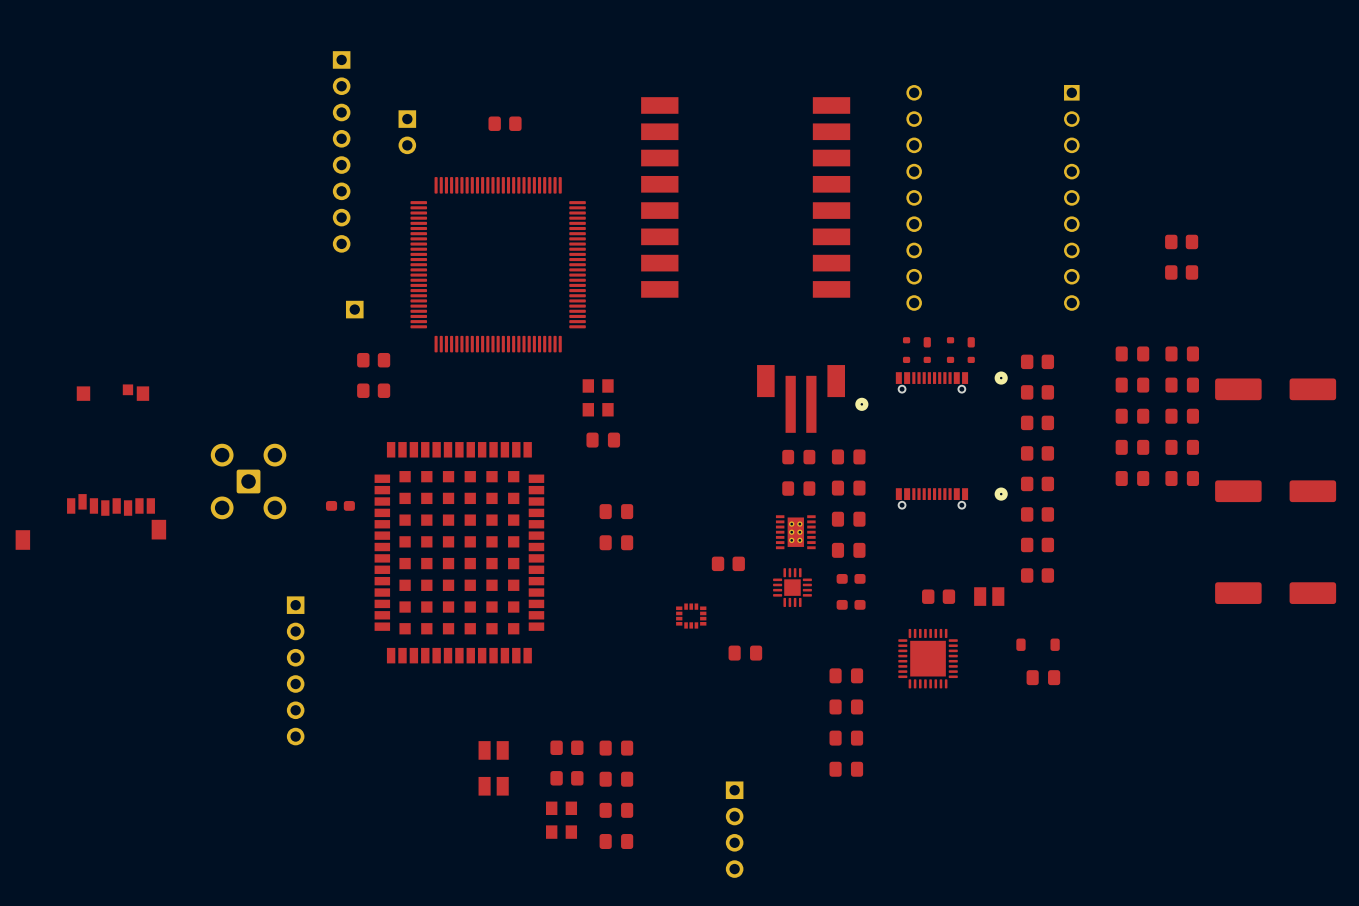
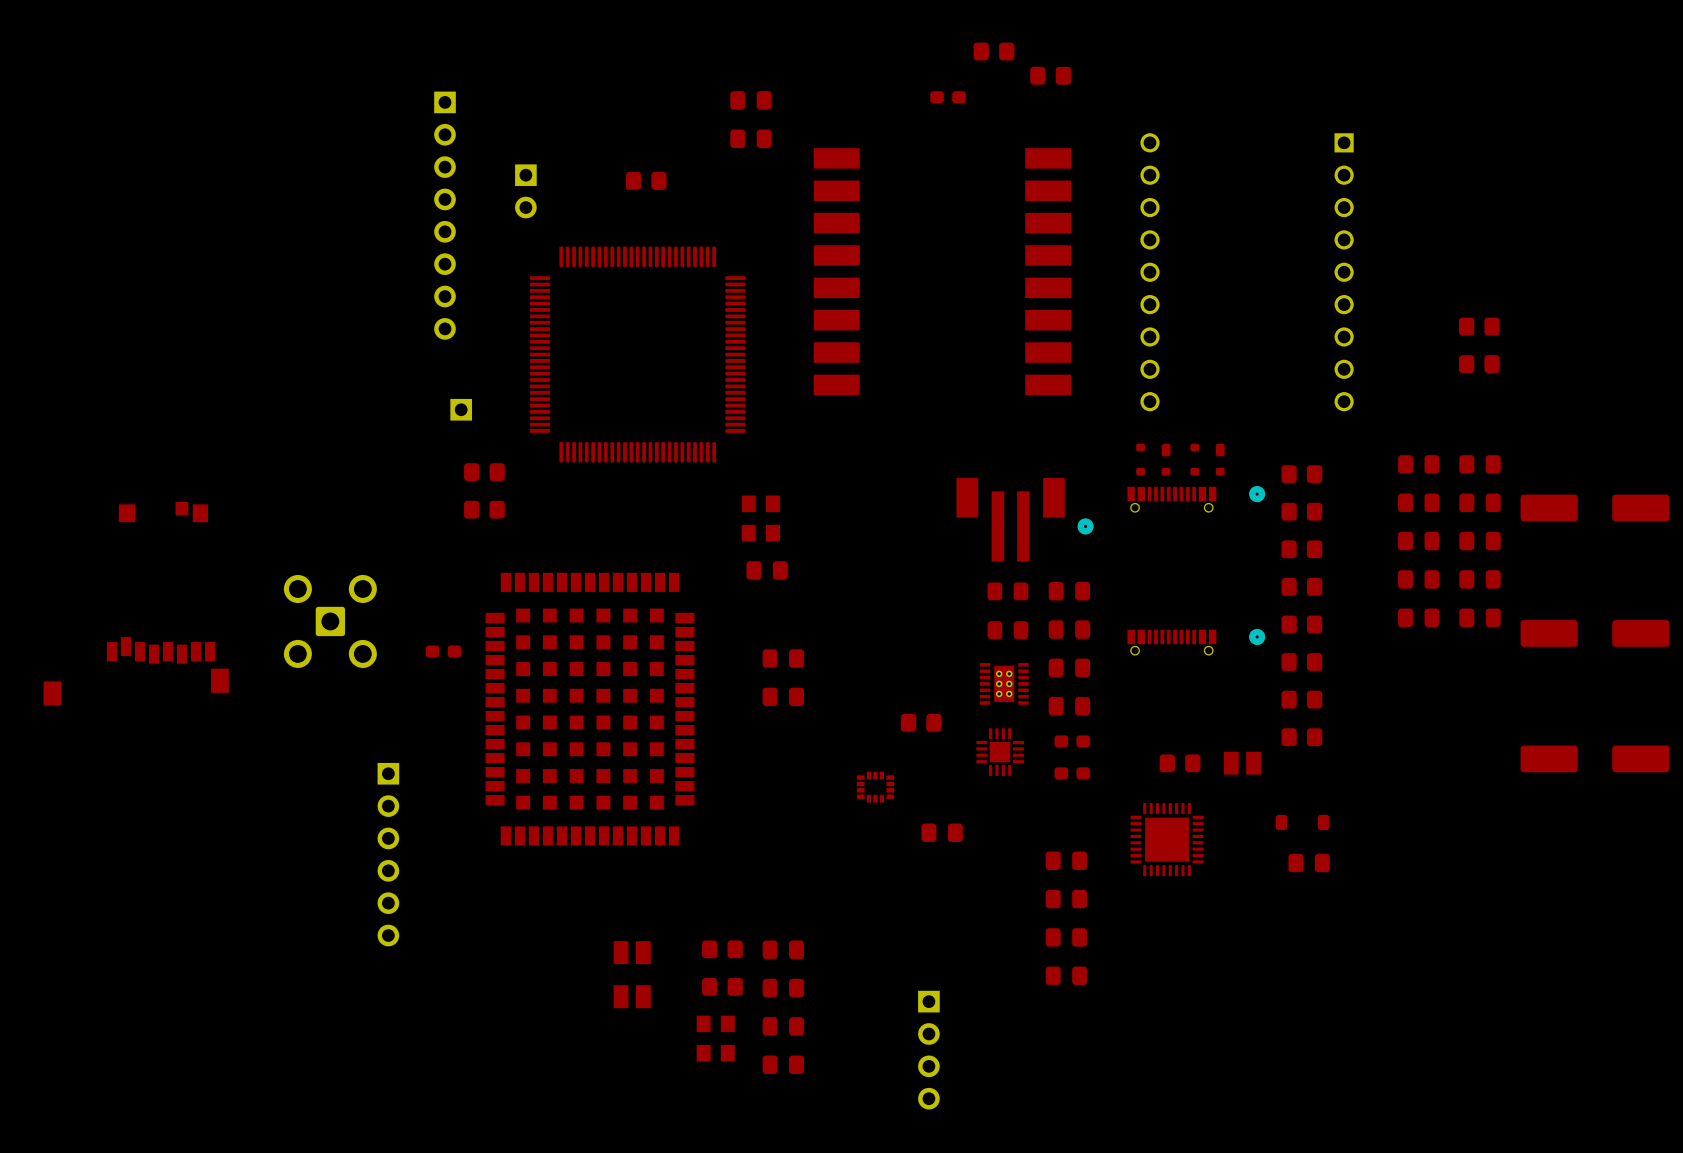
part: none -> (994, 51)
part: none -> (1050, 75)
part: none -> (948, 97)
part: none -> (750, 100)
part: none -> (750, 138)

